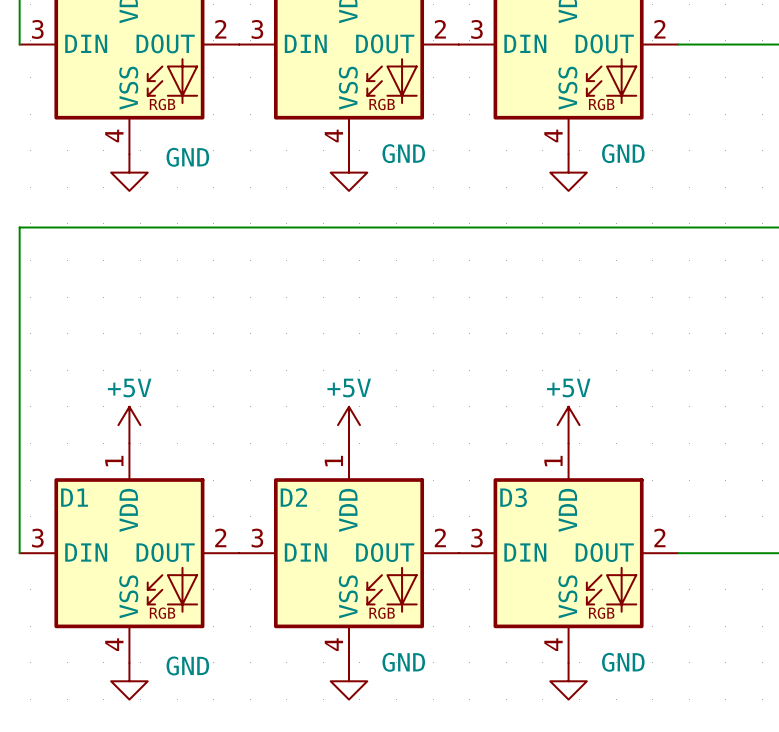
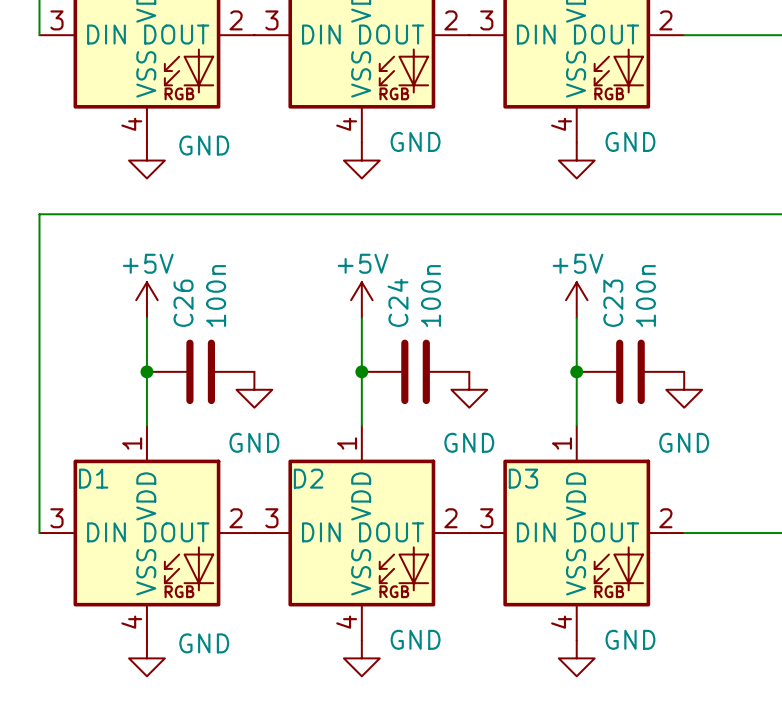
wire: none -> (146, 318) (146, 425)
wire: none -> (361, 318) (361, 425)
wire: none -> (576, 318) (576, 425)
junction: none -> (146, 371)
C26: none -> 100n (200, 371)
junction: none -> (361, 371)
C24: none -> 100n (415, 371)
junction: none -> (576, 371)
C23: none -> 100n (630, 371)
power symbol: none -> GND (254, 389)
power symbol: none -> GND (469, 389)
power symbol: none -> GND (684, 389)
power symbol position: +5V (129, 425) -> +5V (146, 300)
power symbol position: +5V (349, 425) -> +5V (361, 300)
power symbol position: +5V (568, 425) -> +5V (576, 300)

